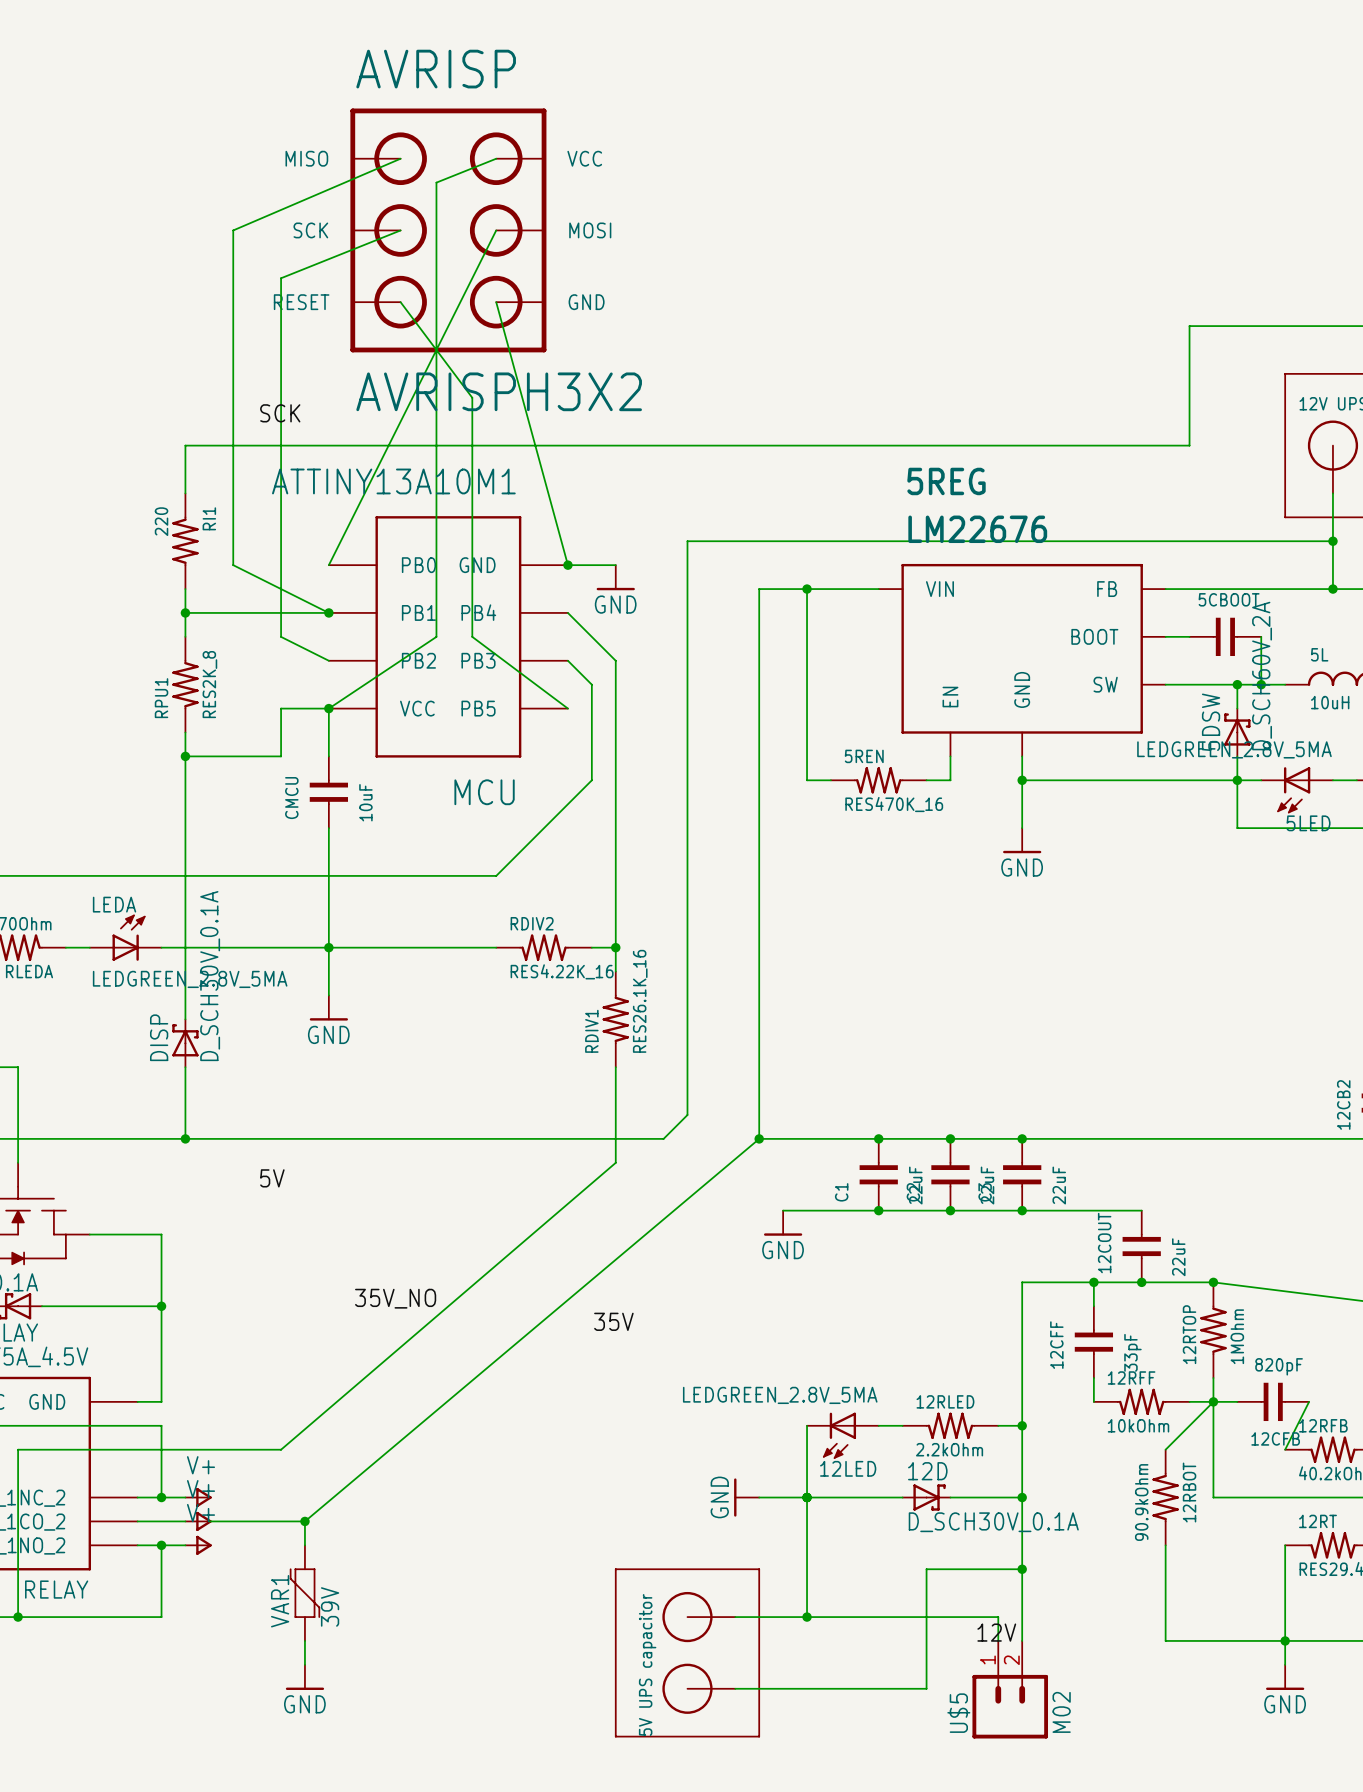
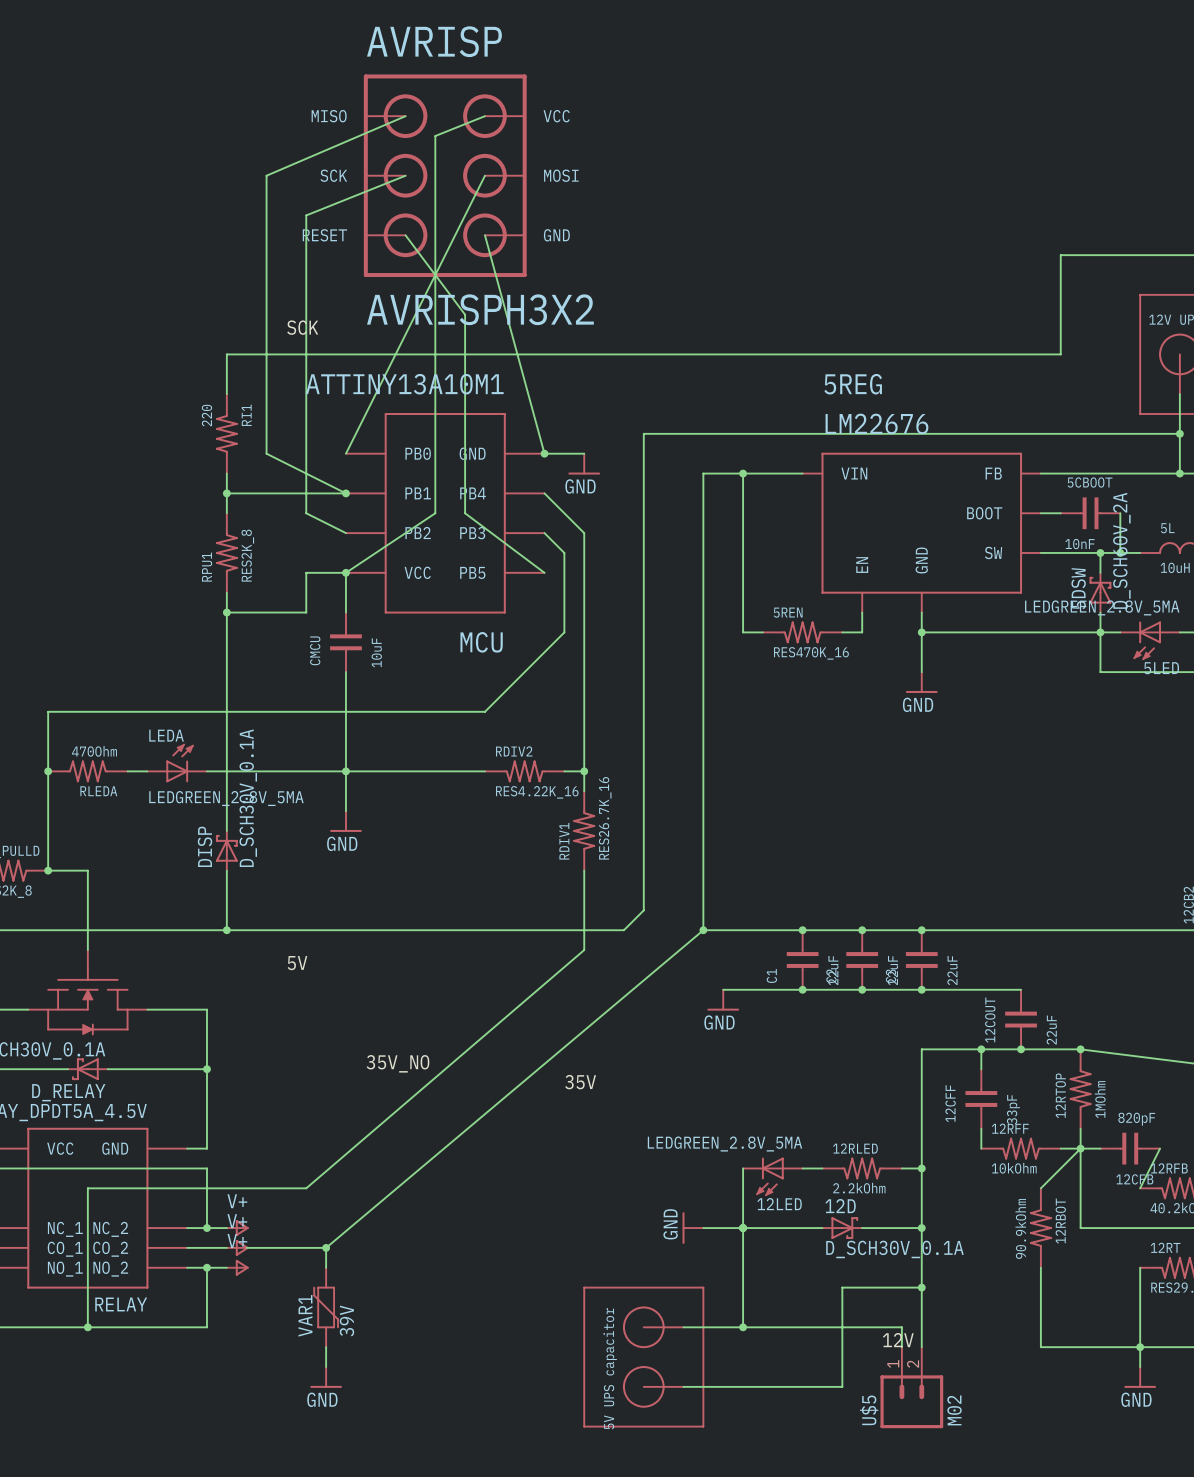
5CBOOT value: none -> 10nF (1079, 544)
RDIV1 value: RES26.1K_16 (640, 1001) -> RES26.7K_16 (605, 818)

